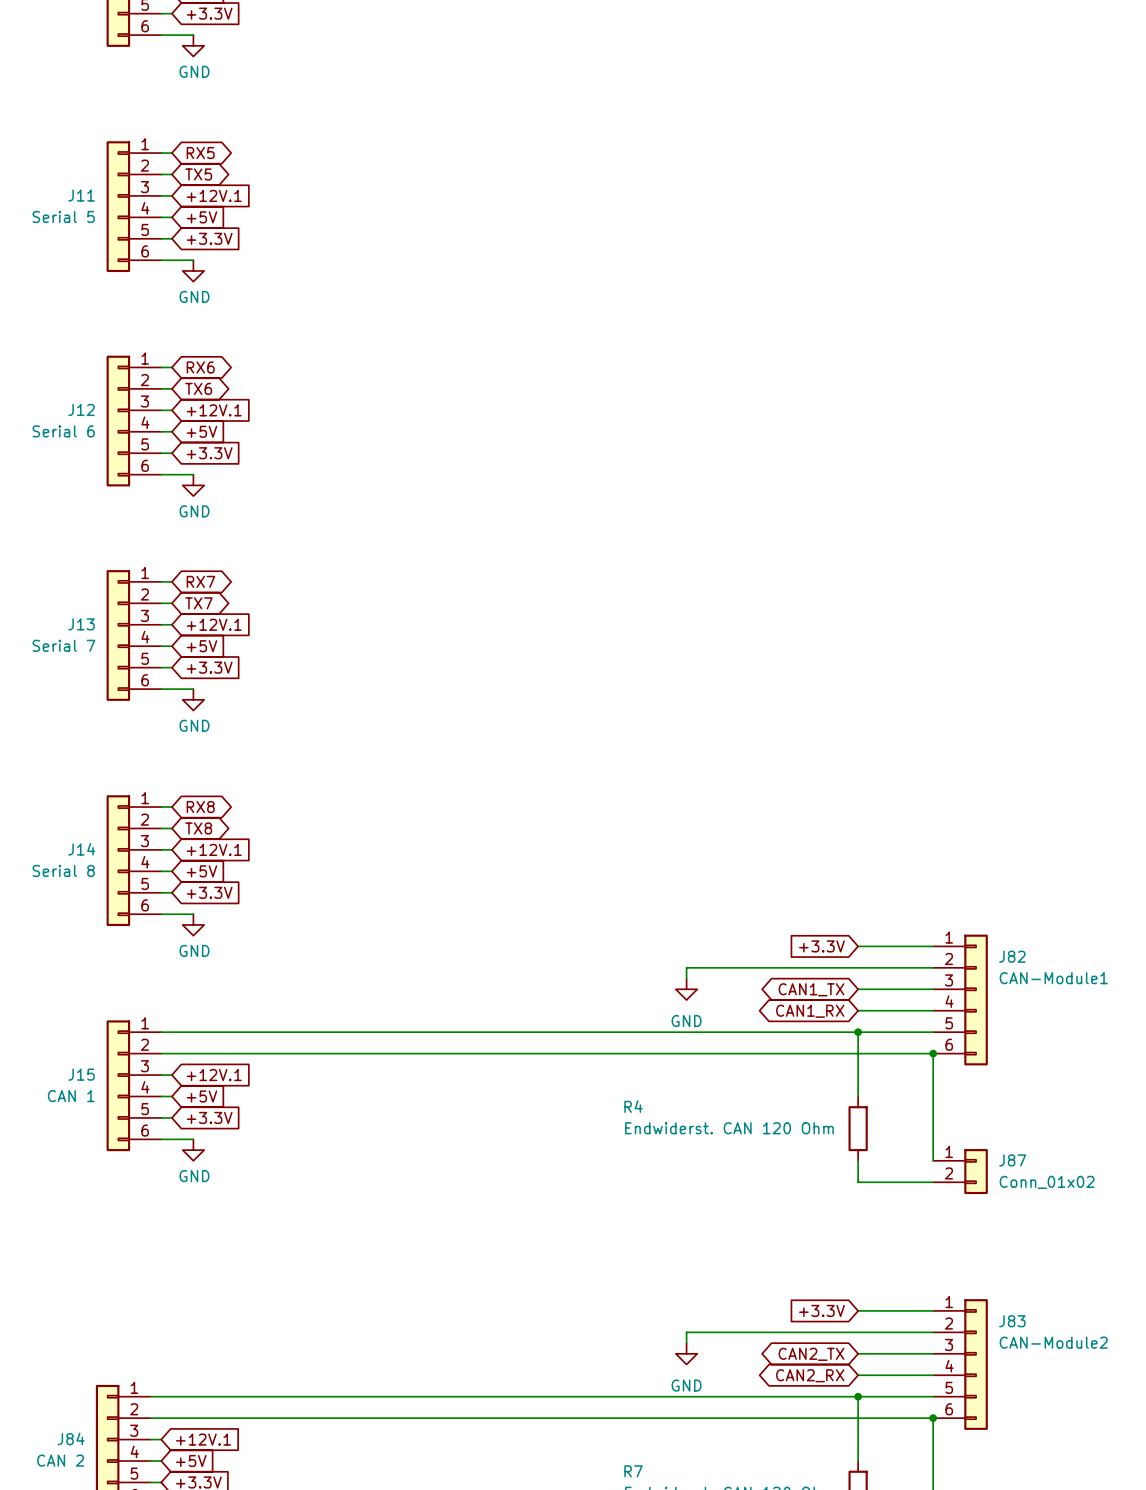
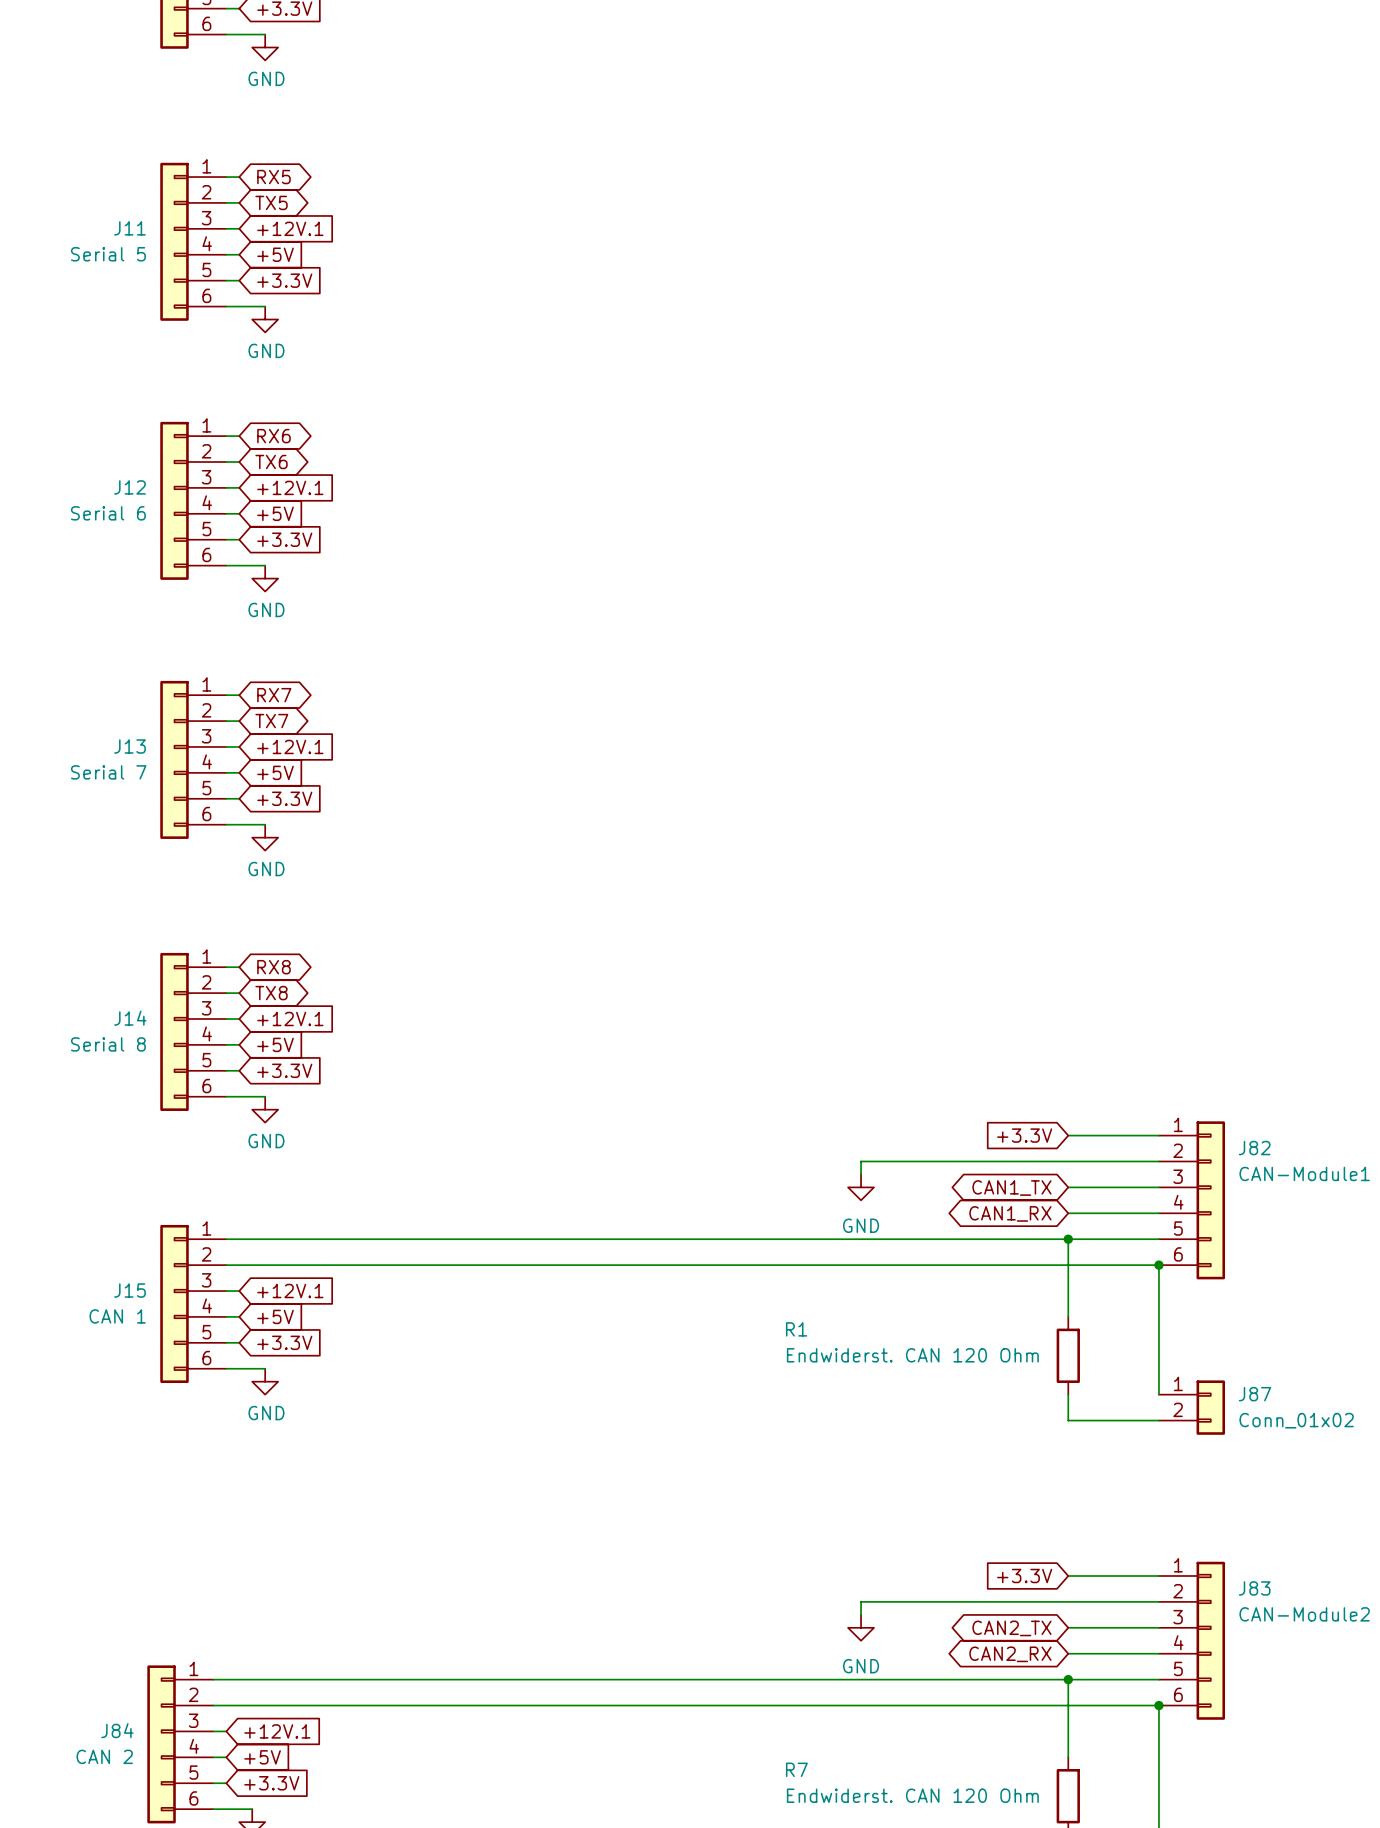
R4 name: R4 (633, 1106) -> R1 (796, 1329)

